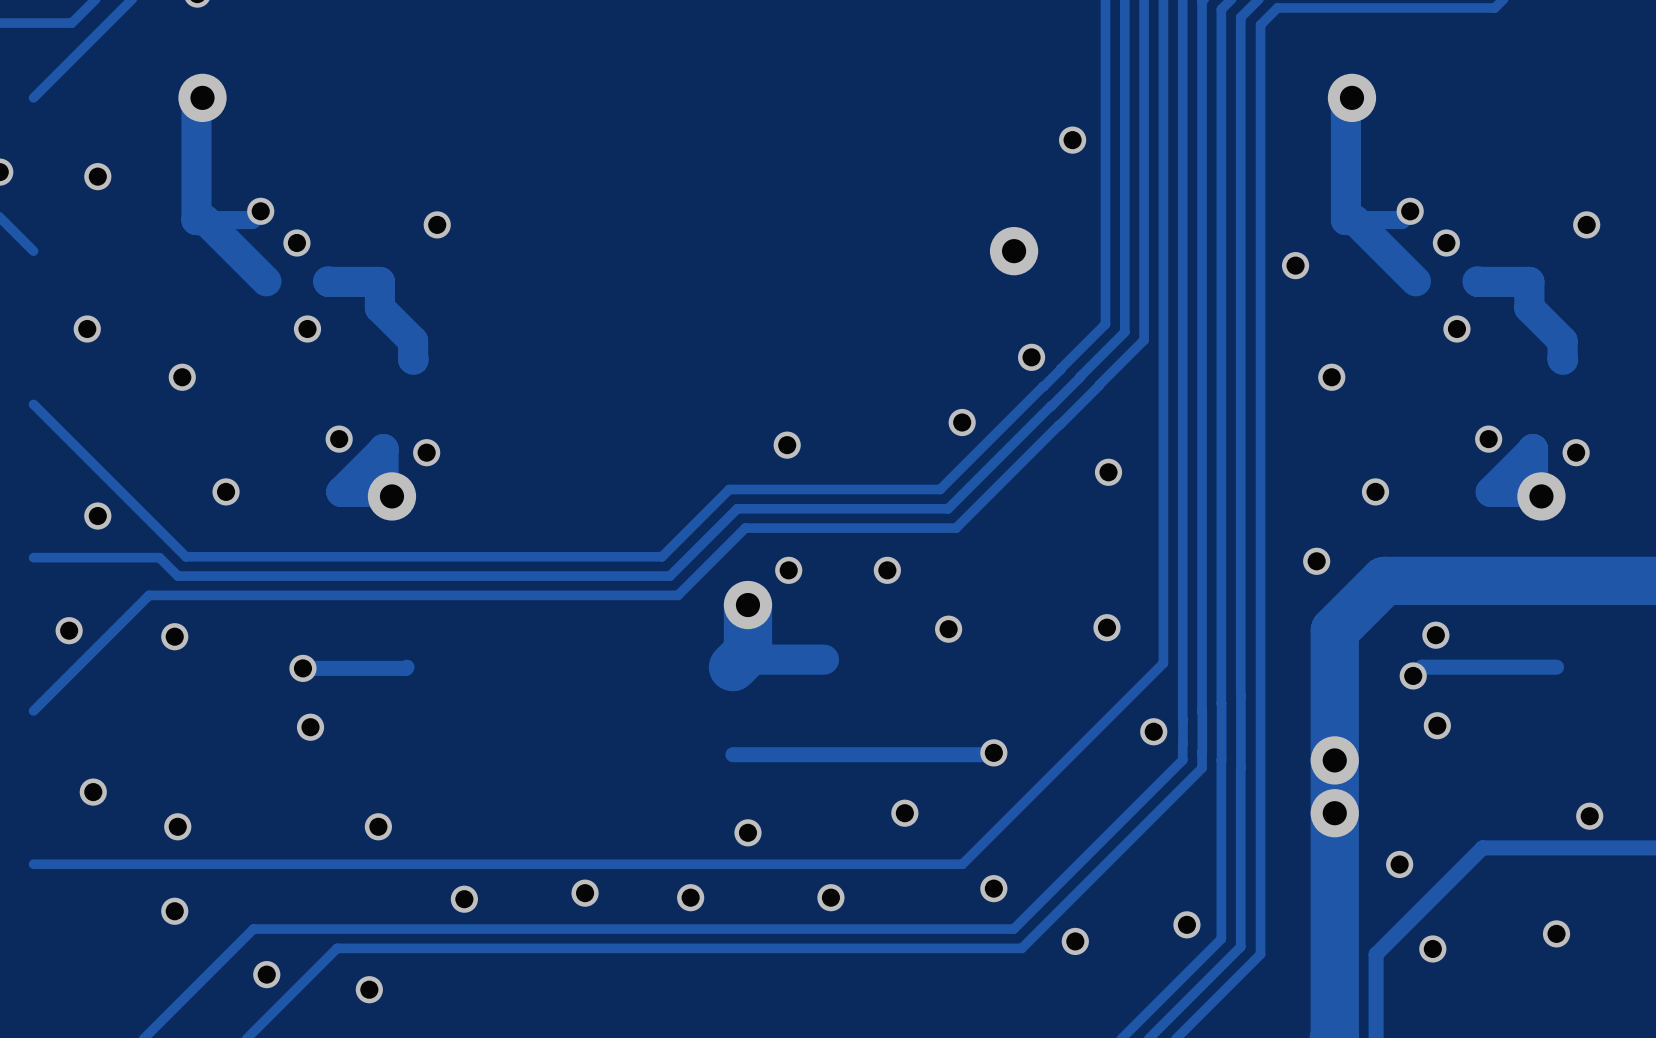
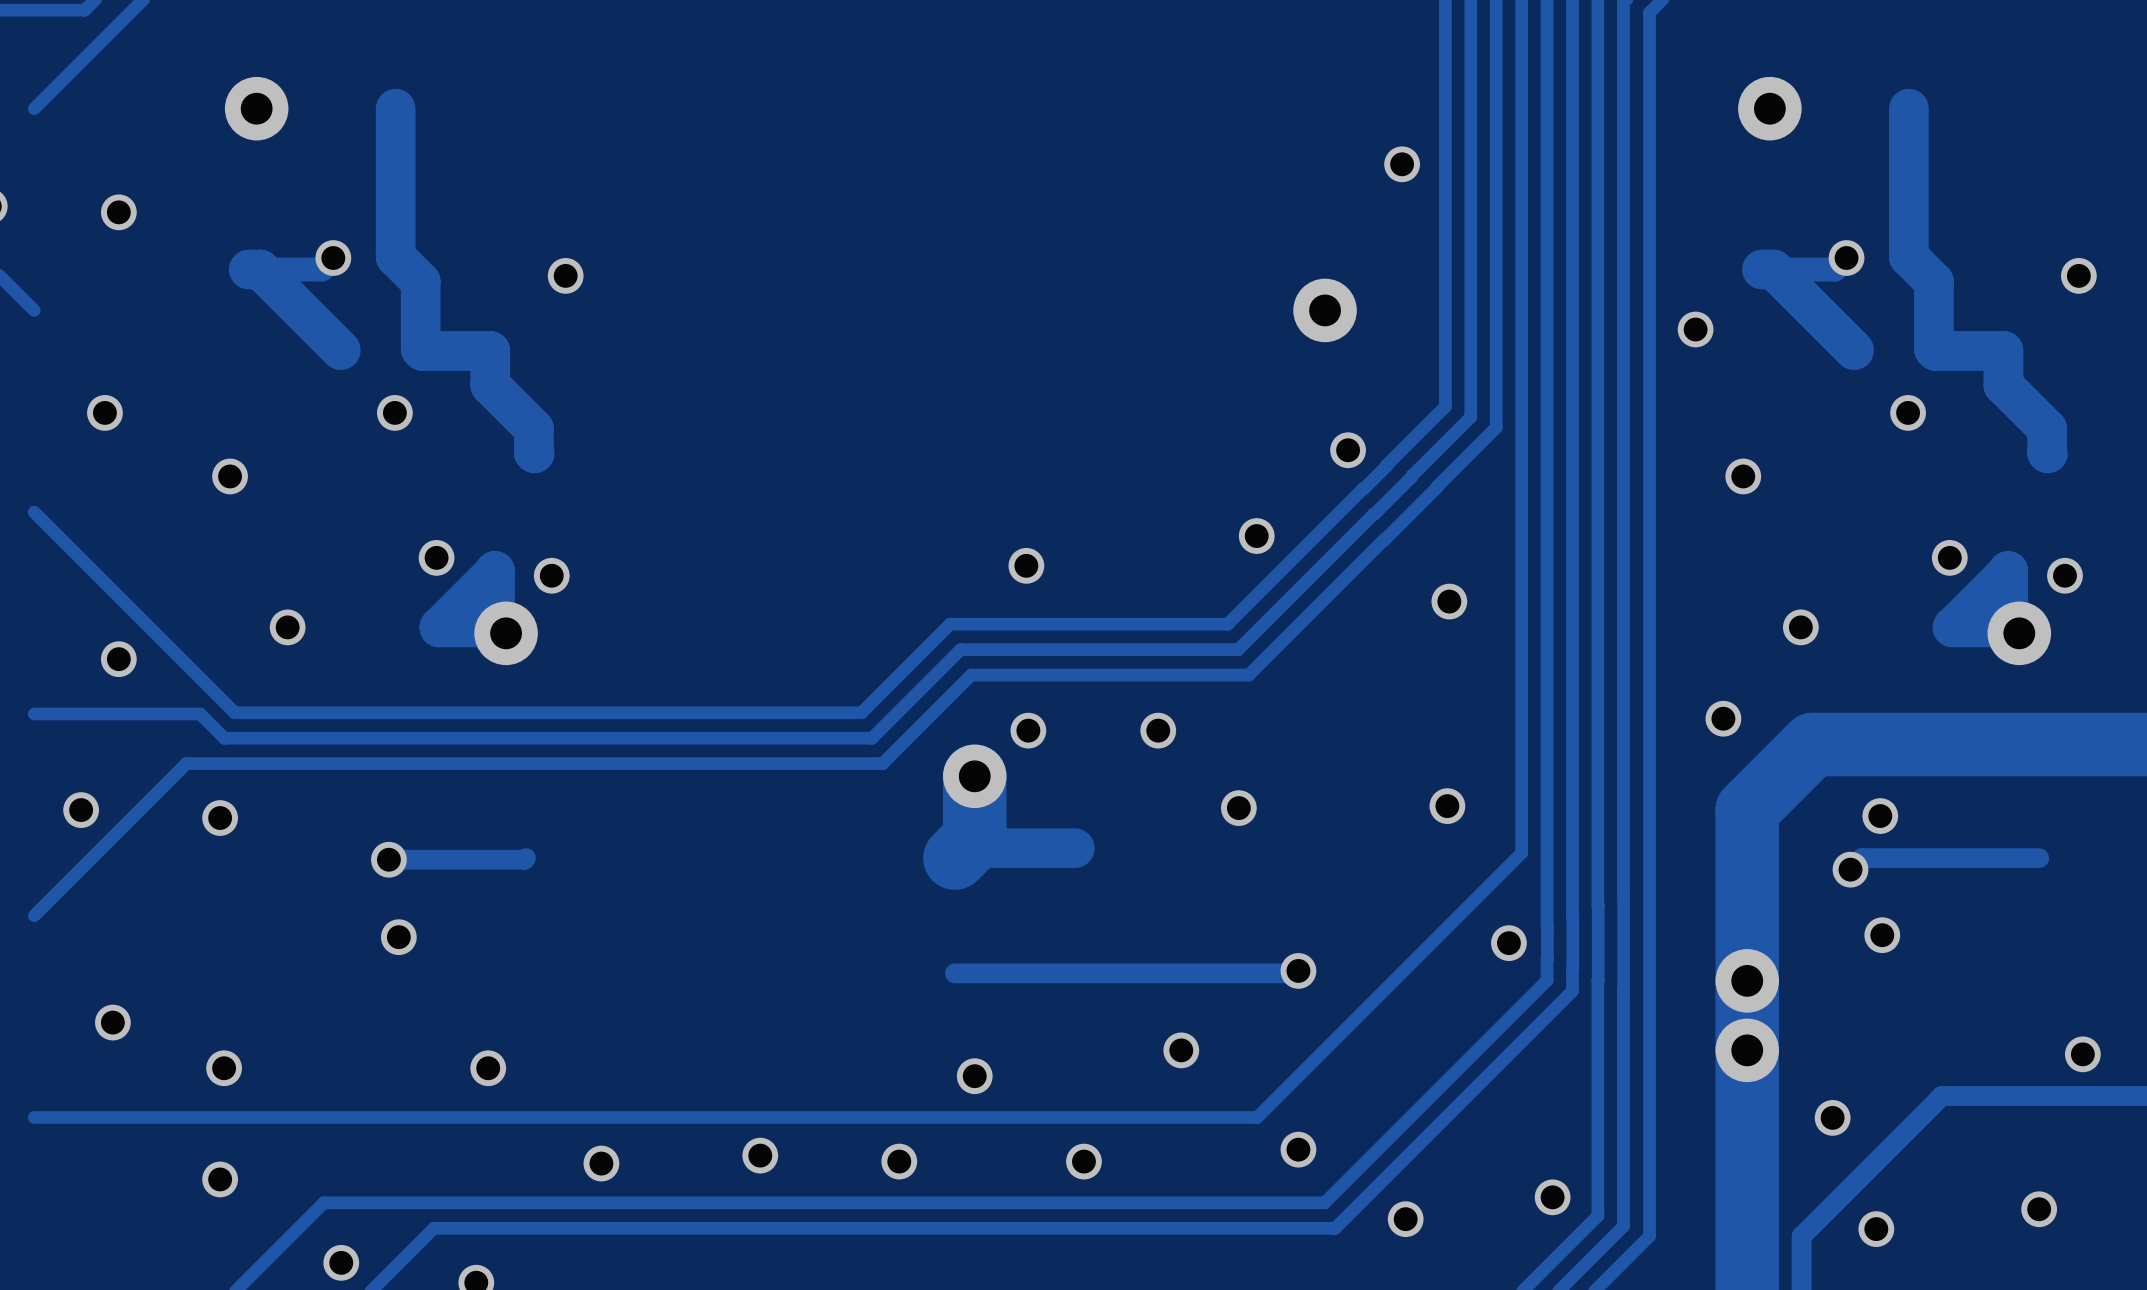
track: (202, 97) (196, 103) (196, 220) -> none
track: none -> (395, 108) (395, 256) (420, 281) (421, 350)
track: (1351, 97) (1345, 103) (1345, 220) -> none
track: none -> (1908, 108) (1908, 256) (1933, 281) (1935, 350)
via: (296, 243) -> none
via: (1446, 243) -> none

